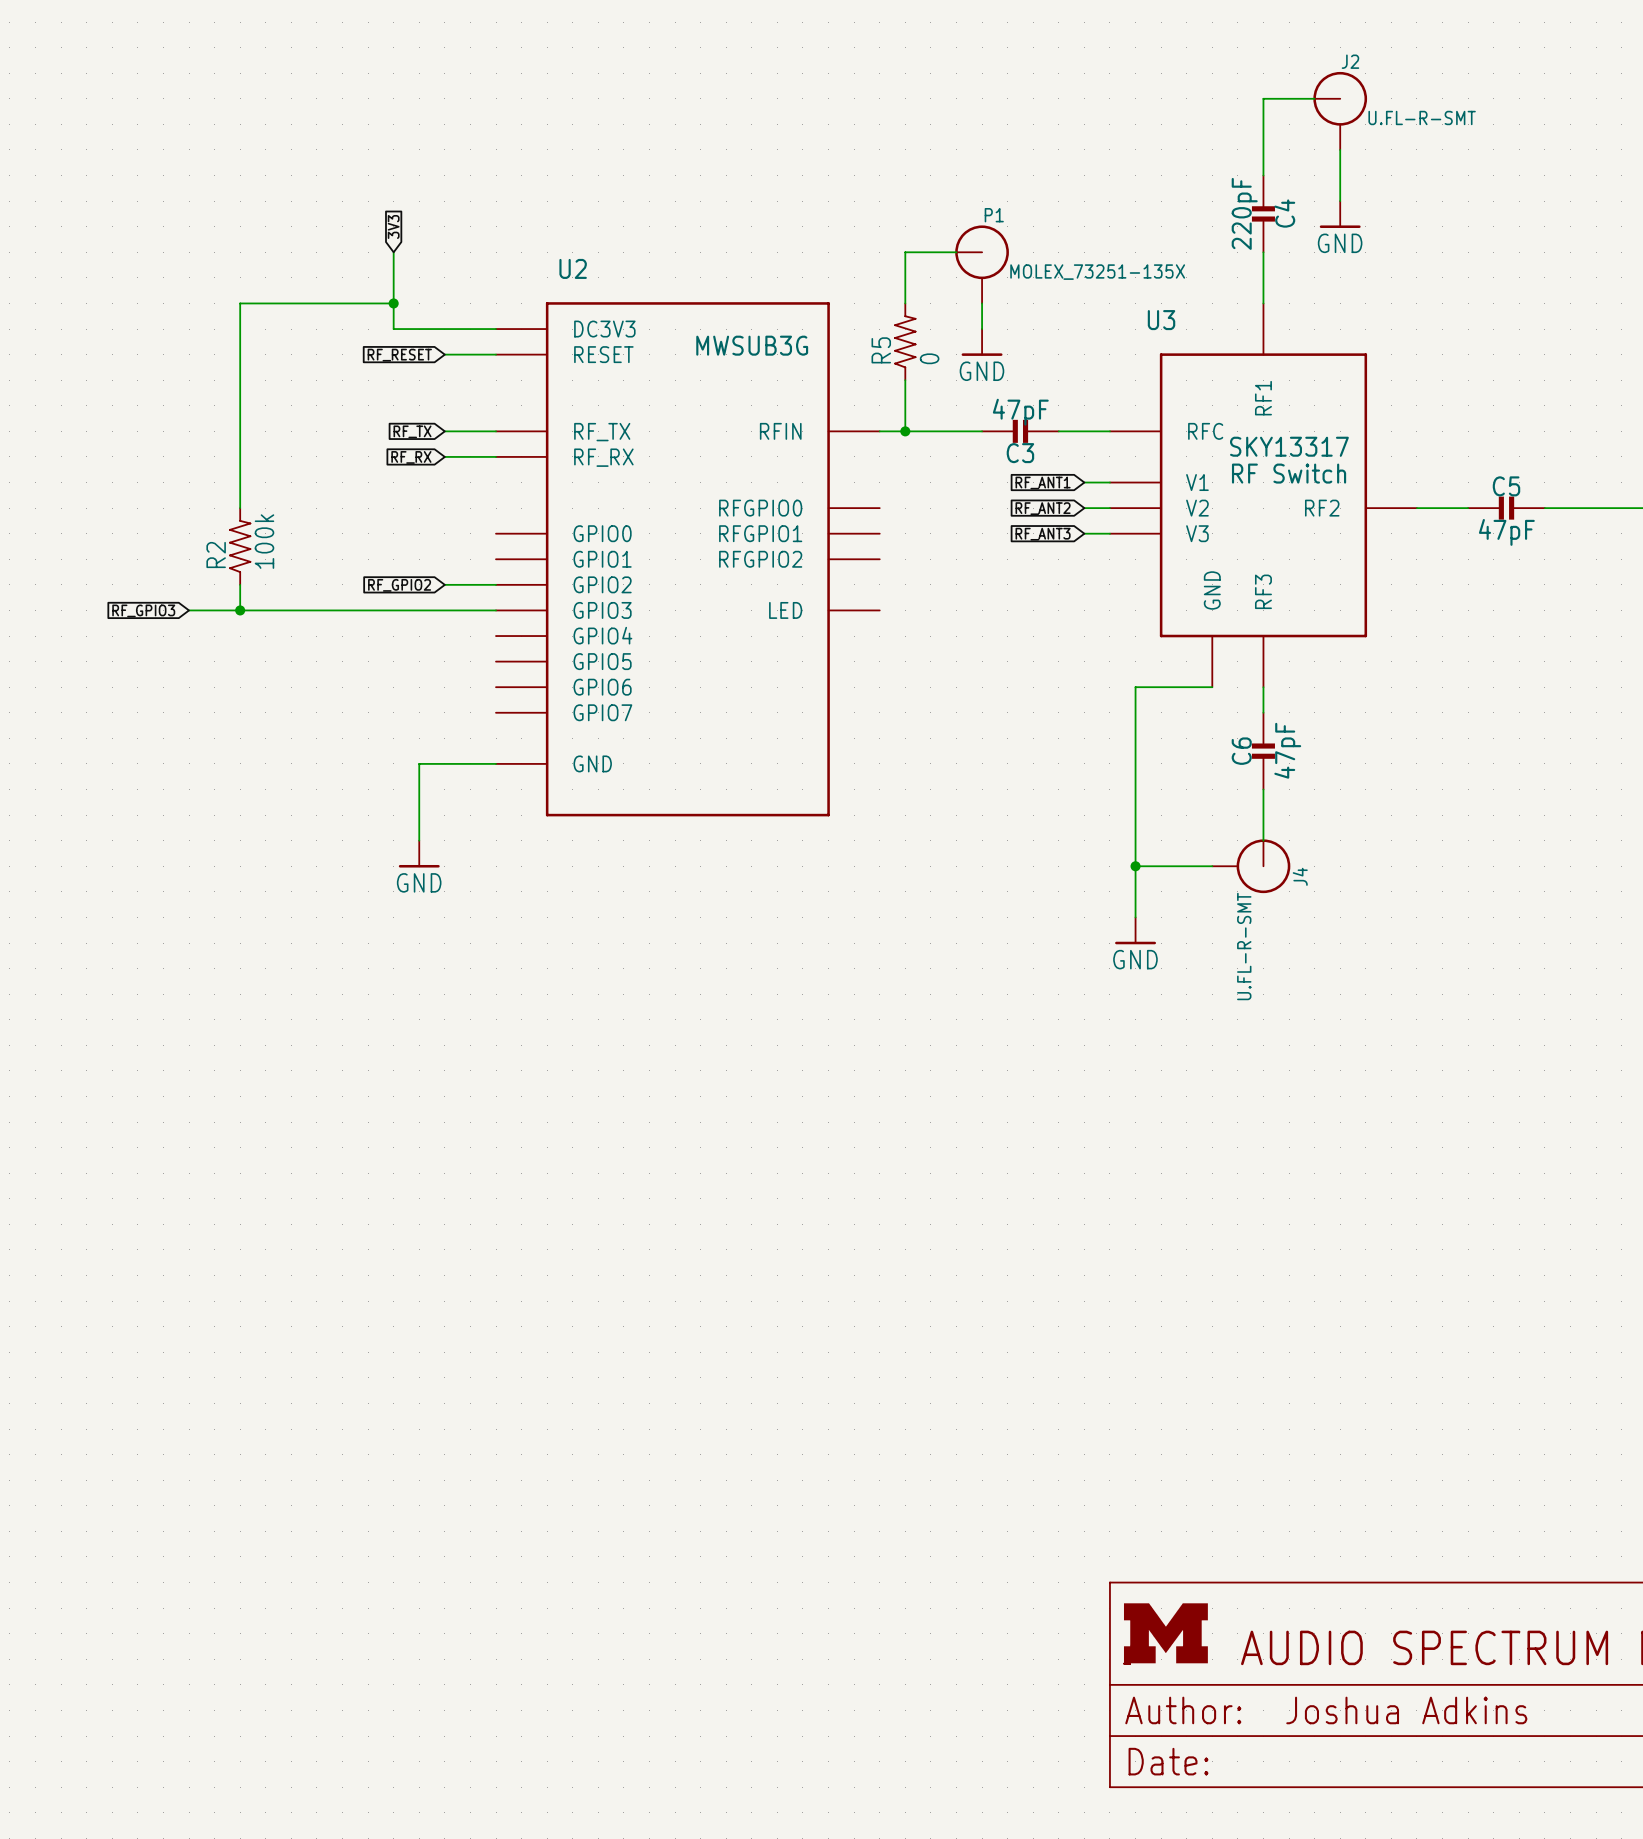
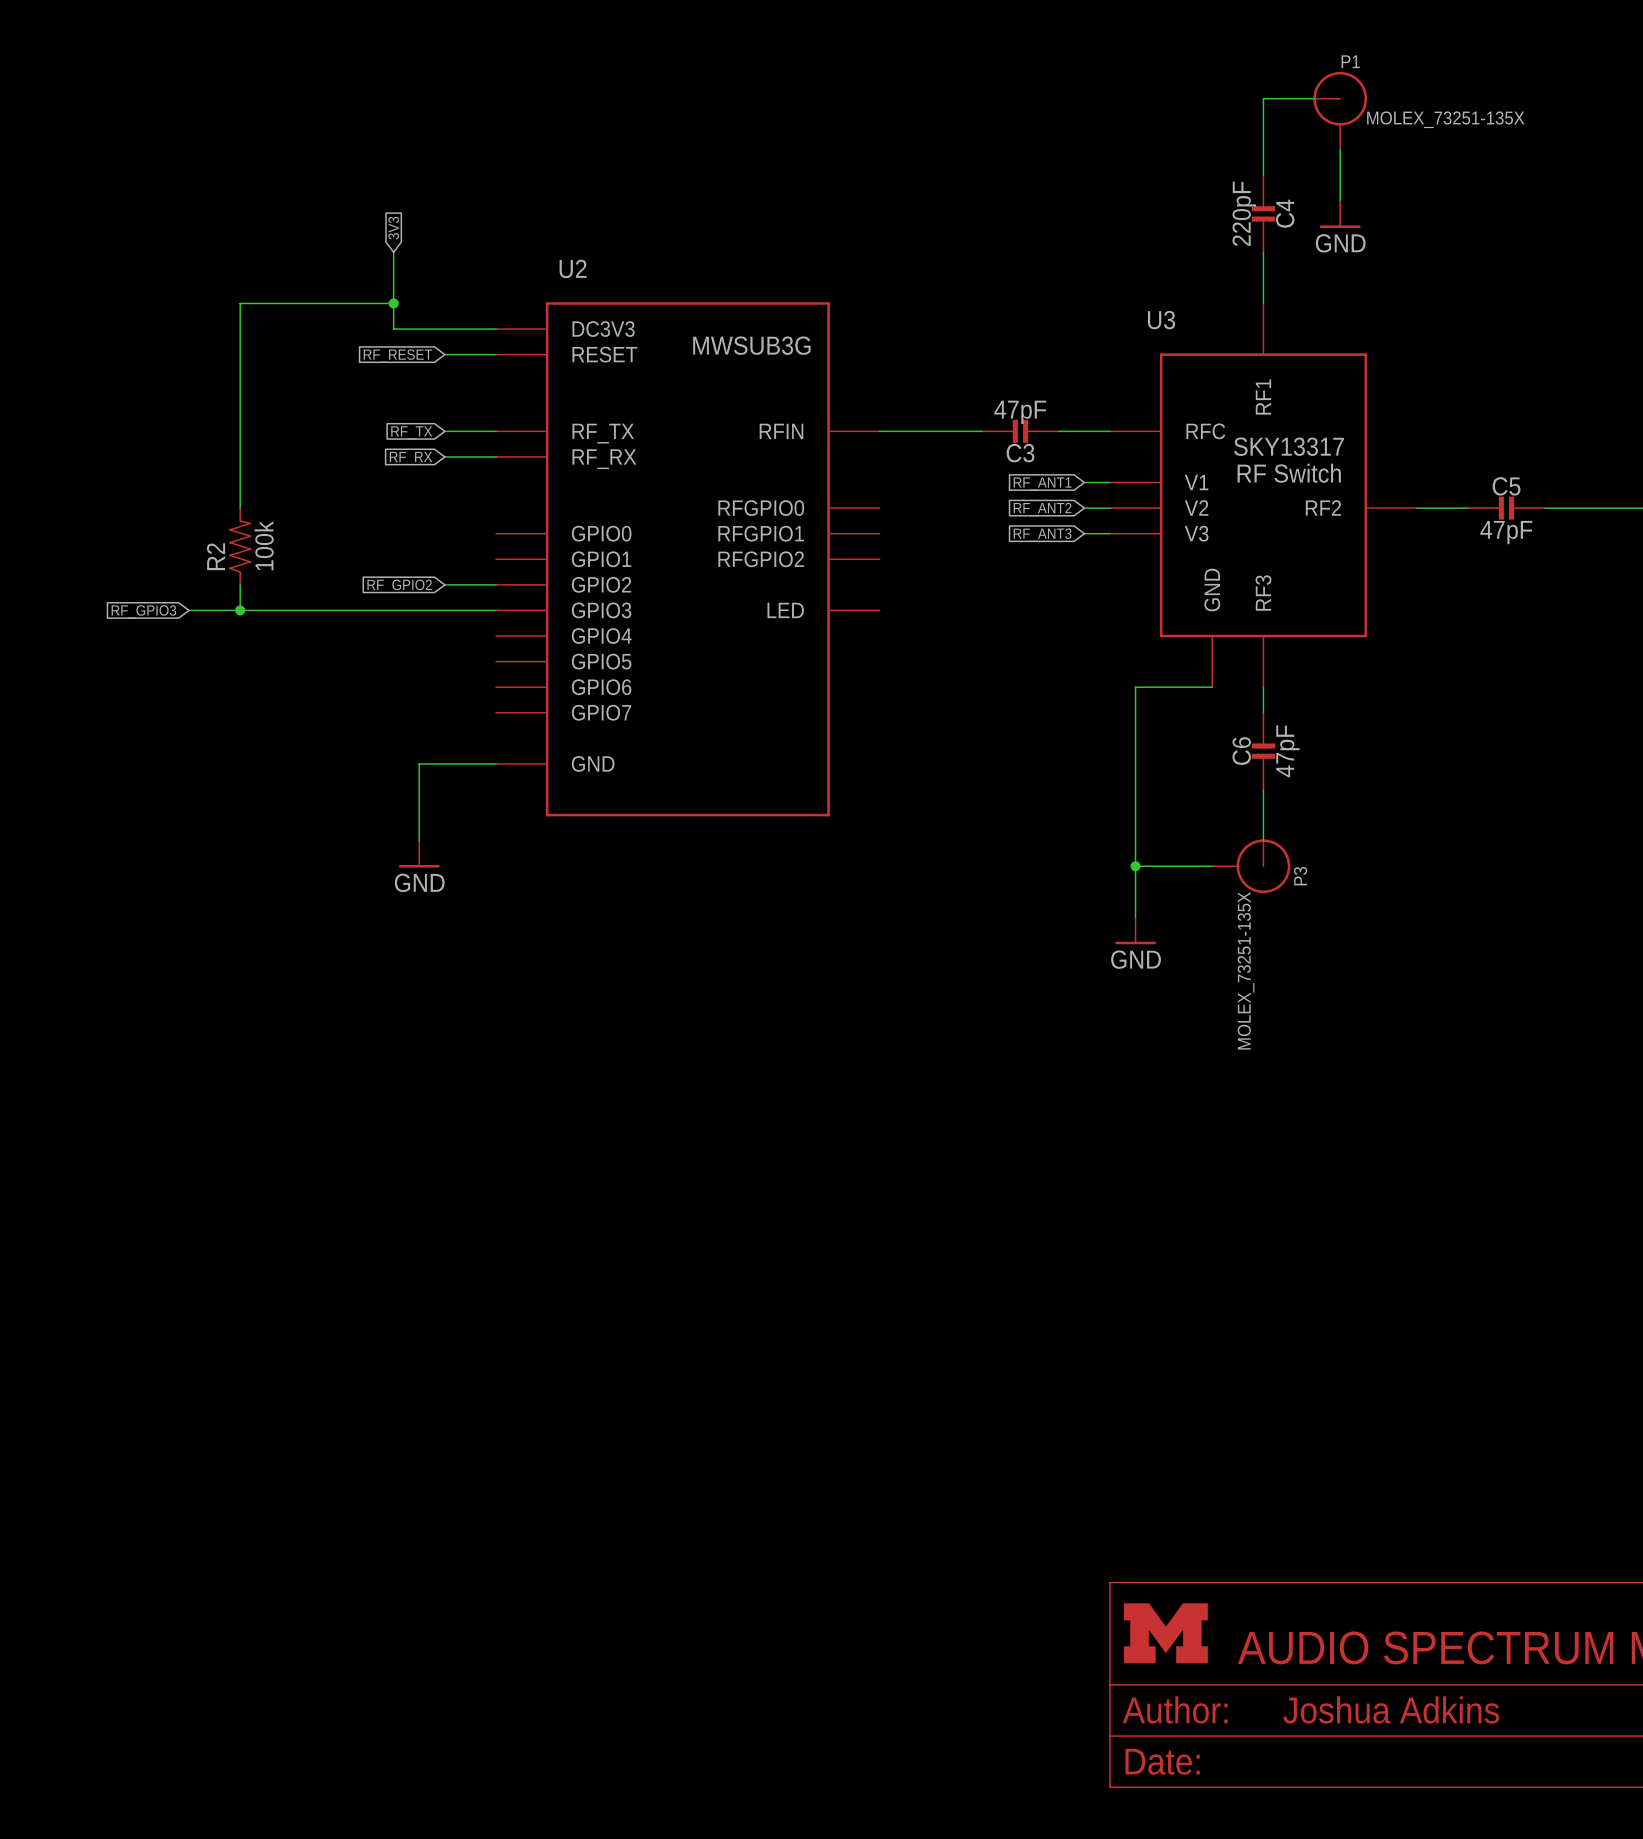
J2 name: J2 (1350, 61) -> P1 (1350, 61)
J2 value: U.FL-R-SMT (1422, 117) -> MOLEX_73251-135X (1445, 119)
wire: (956, 252) (905, 252) (905, 303) -> none
P1: MOLEX_73251-135X (982, 264) -> none
wire: (982, 303) (982, 329) -> none
R5: 0 (905, 341) -> none
power symbol: GND (982, 342) -> none
wire: (905, 380) (905, 431) -> none
junction: (905, 431) -> none
J4 name: J4 (1300, 876) -> P3 (1300, 876)
J4 value: U.FL-R-SMT (1244, 946) -> MOLEX_73251-135X (1246, 970)

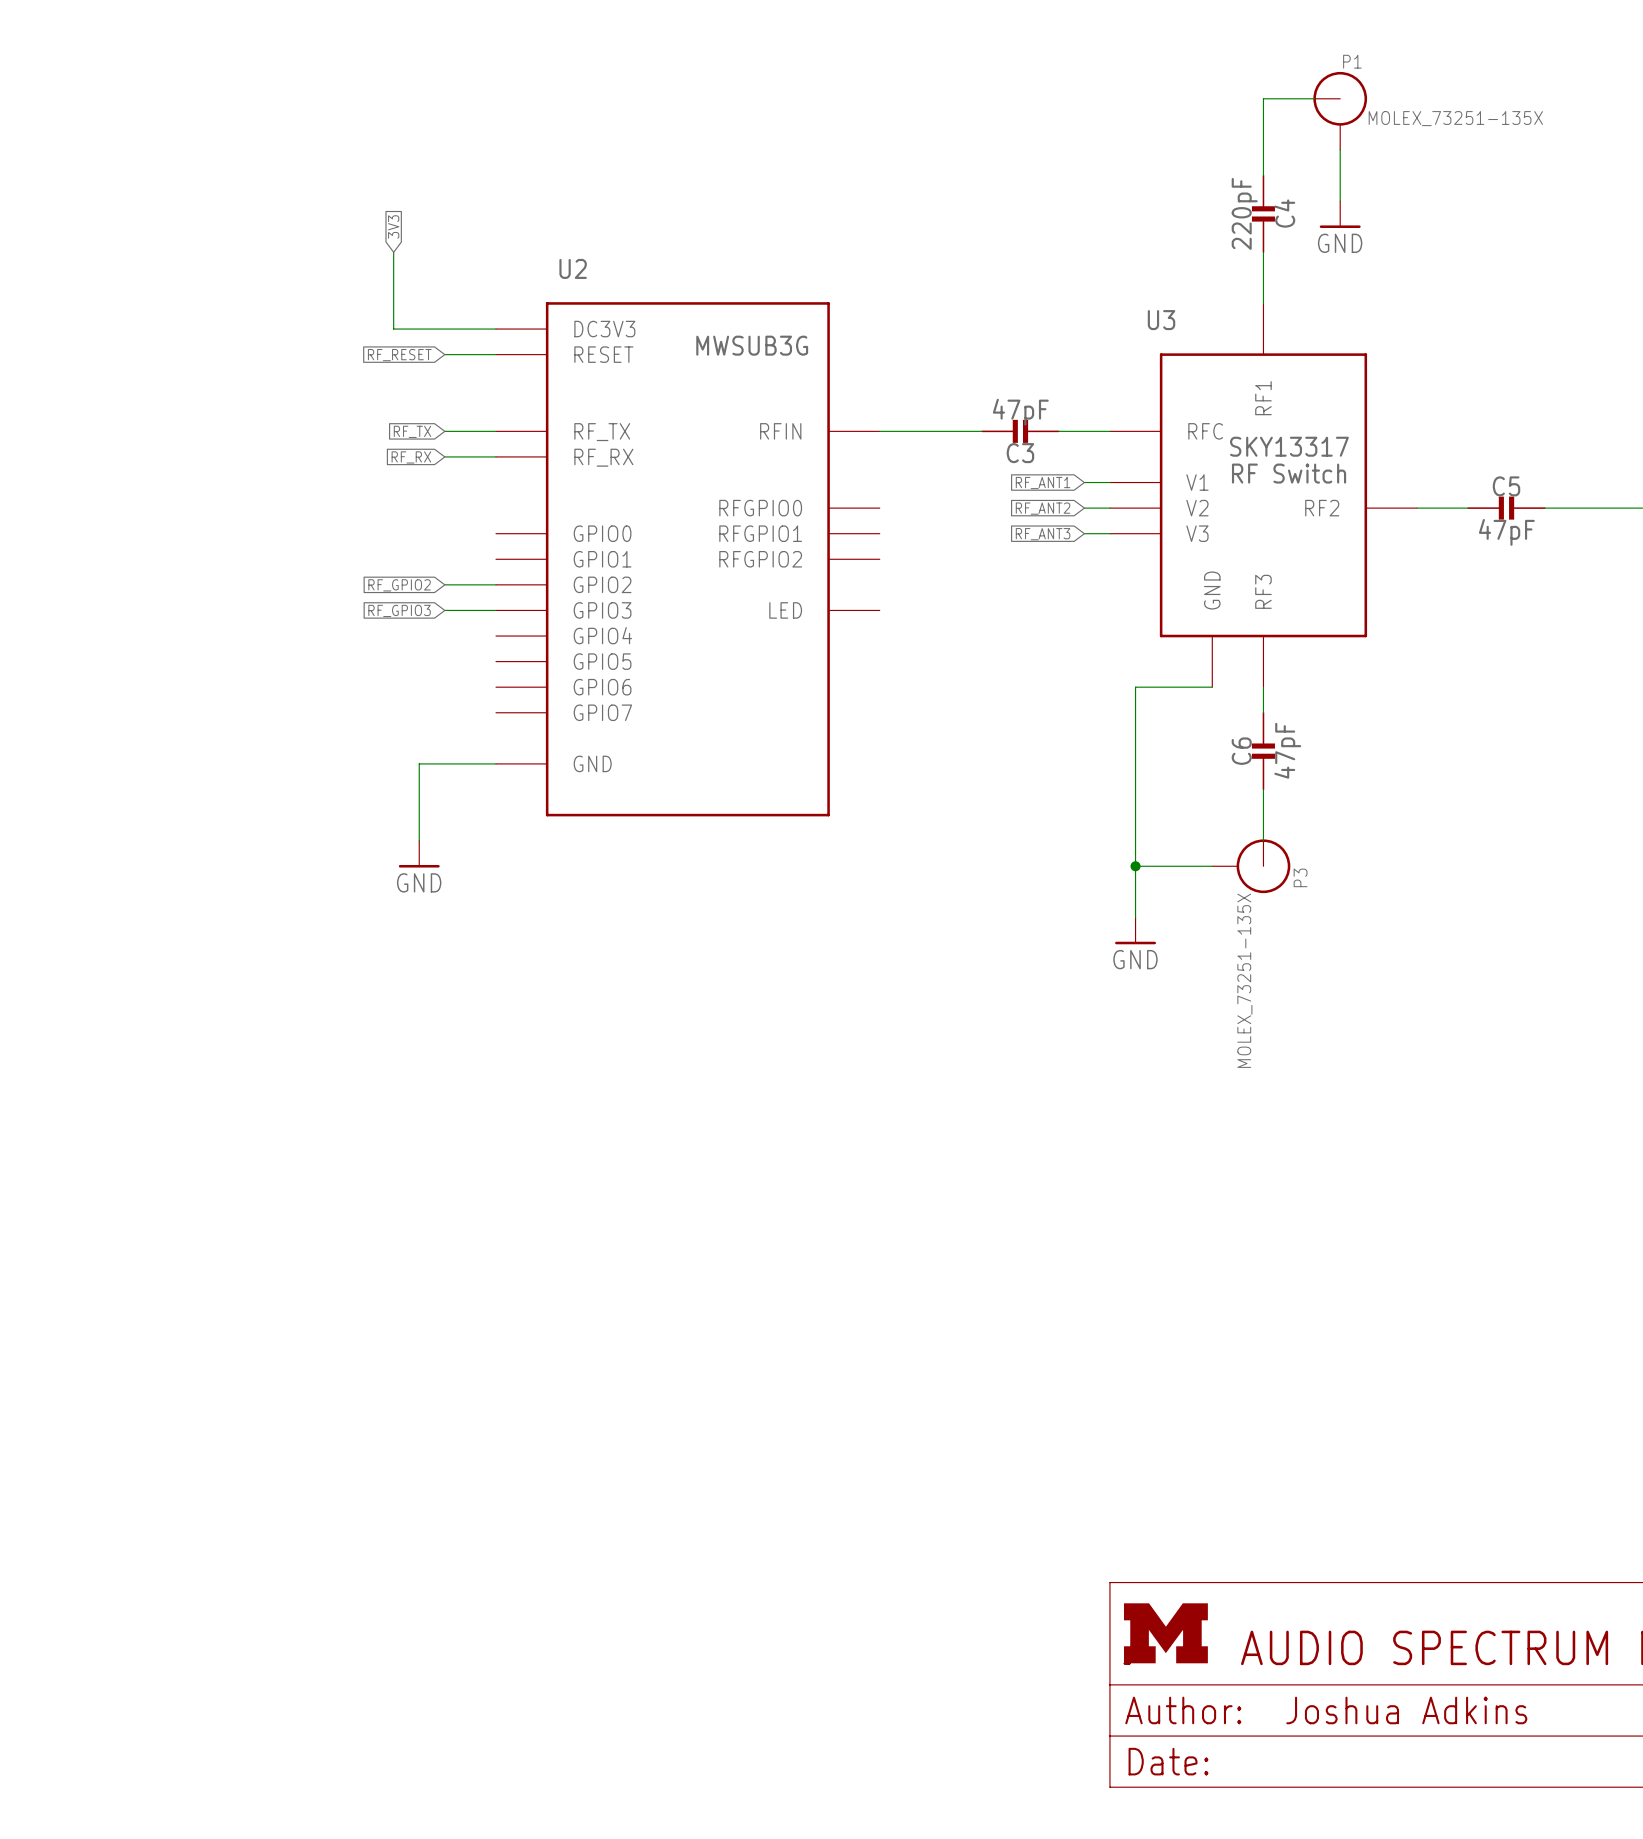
wire: (393, 303) (240, 303) (240, 508) -> none
junction: (393, 303) -> none
R2: 100k (240, 546) -> none
wire: (240, 584) (240, 610) -> none
wire: (189, 610) (444, 610) -> none
junction: (240, 610) -> none
global label: RF_GPIO3 (143, 611) -> none
global label: none -> RF_GPIO3 (399, 610)

